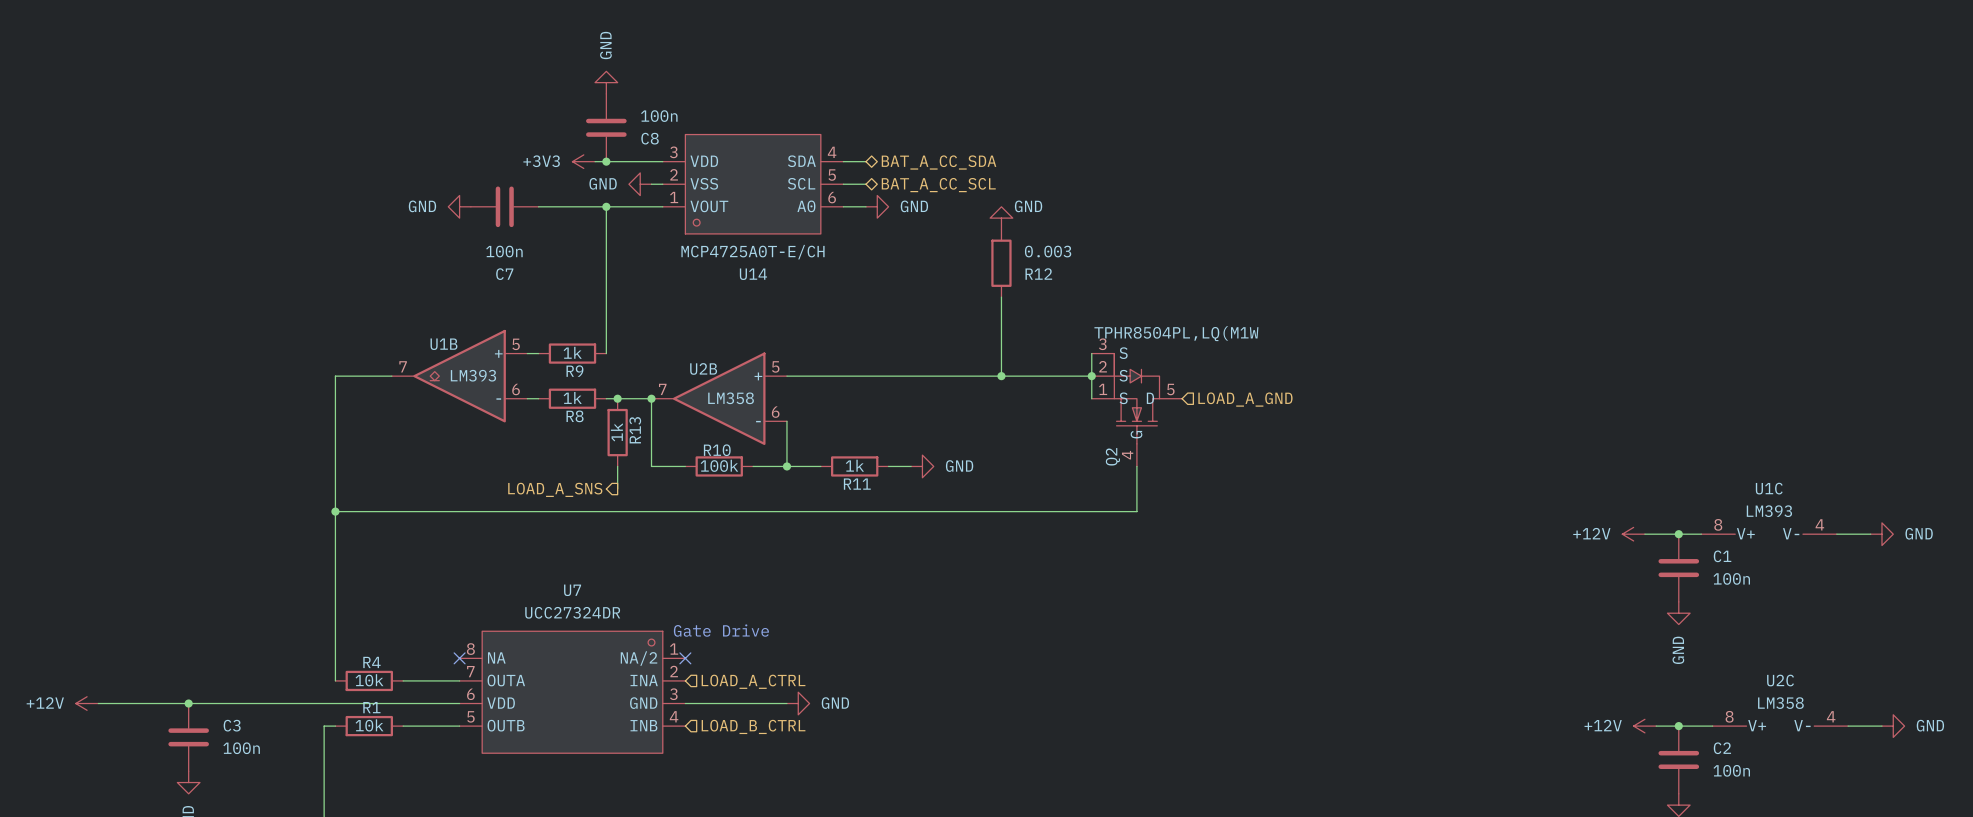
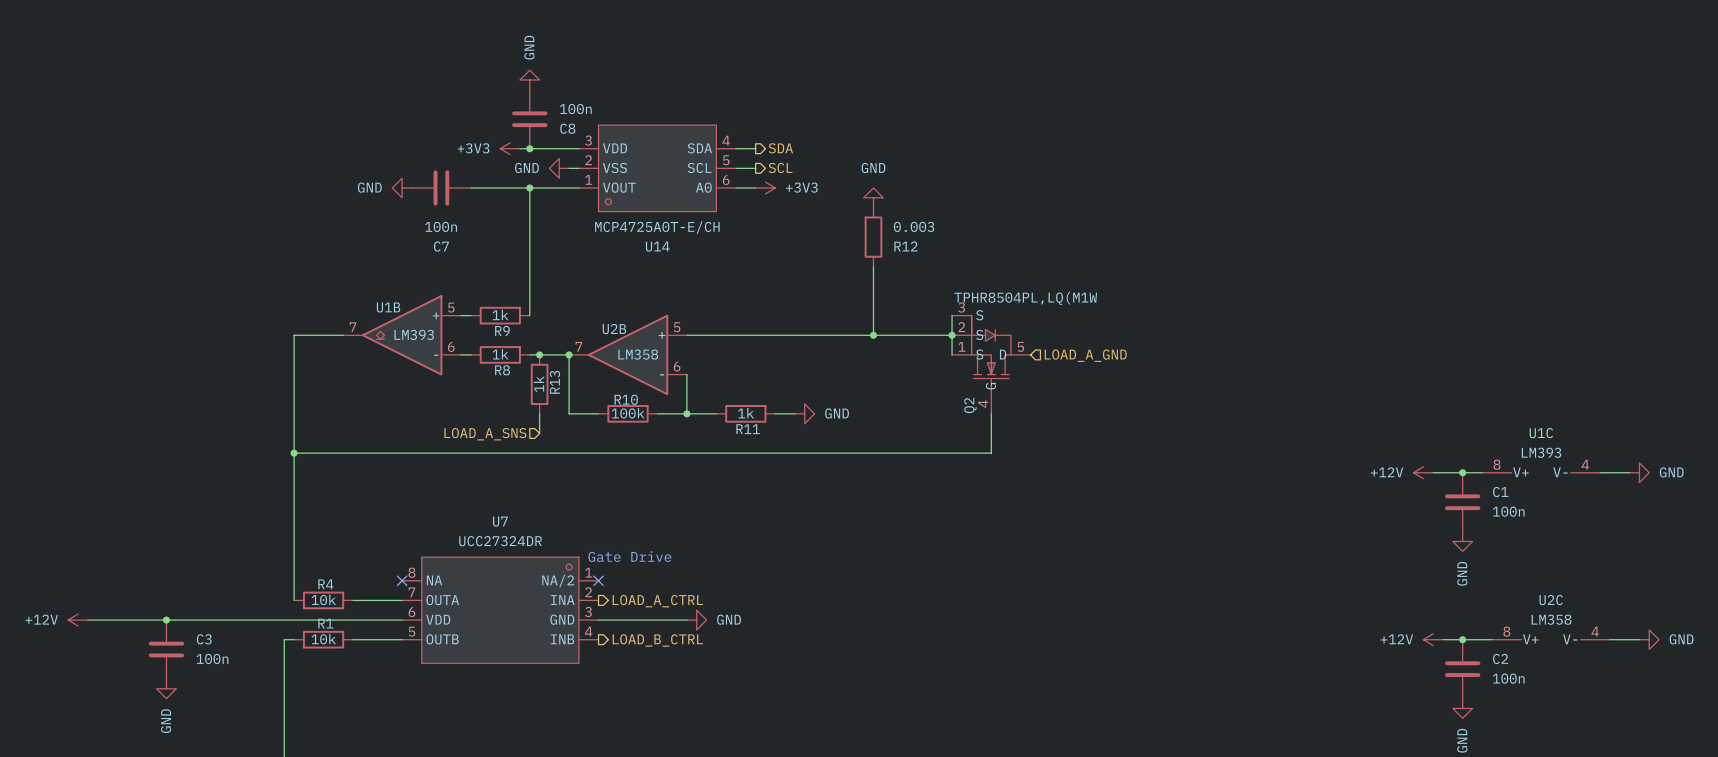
hierarchical label shape: bidirectional (939, 162) -> output (780, 148)
hierarchical label: BAT_A_CC_SDA (939, 162) -> SDA (780, 148)
hierarchical label shape: bidirectional (938, 185) -> output (780, 167)
hierarchical label: BAT_A_CC_SCL (938, 185) -> SCL (780, 167)
power symbol: GND (877, 206) -> +3V3 (765, 187)
power symbol text position: GND (1028, 206) -> GND (873, 167)
hierarchical label shape: output (555, 489) -> input (485, 434)
hierarchical label shape: input (753, 681) -> output (657, 601)
hierarchical label shape: input (753, 726) -> output (657, 640)

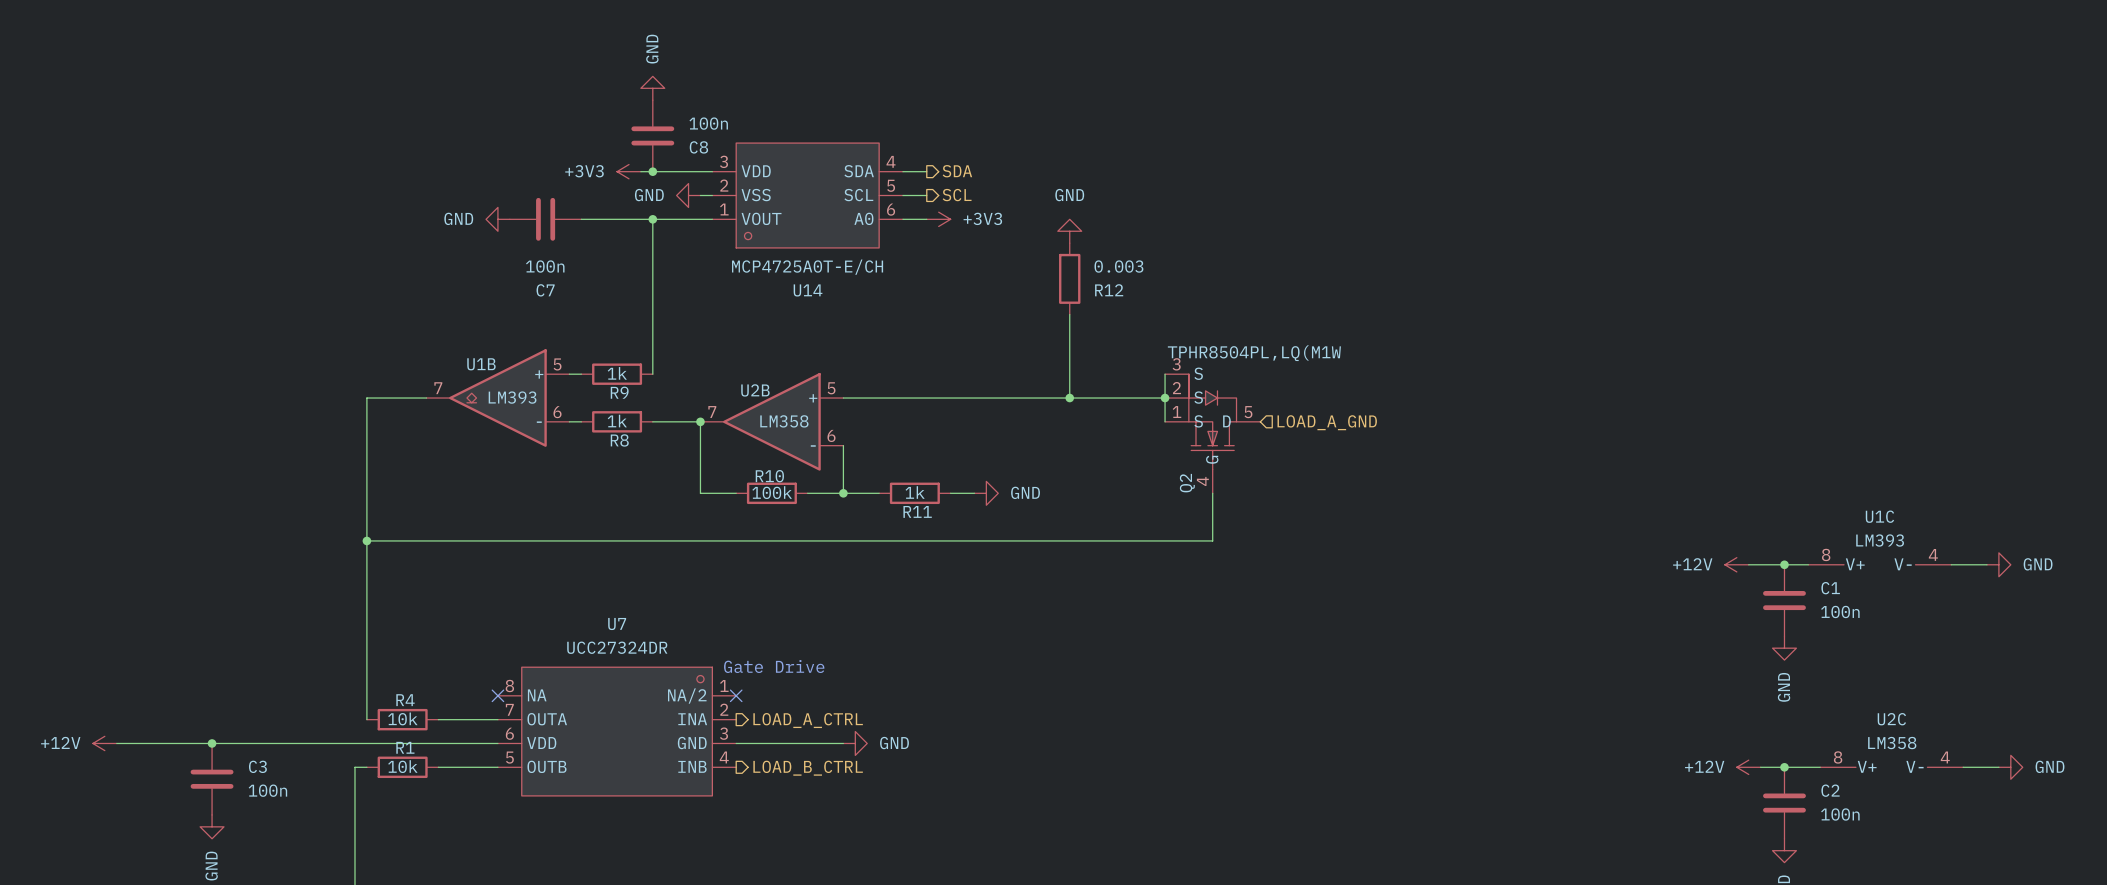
junction: (539, 354) -> none
R13: 1k (539, 384) -> none
wire: (539, 413) (539, 433) -> none
hierarchical label: LOAD_A_SNS (485, 434) -> none

